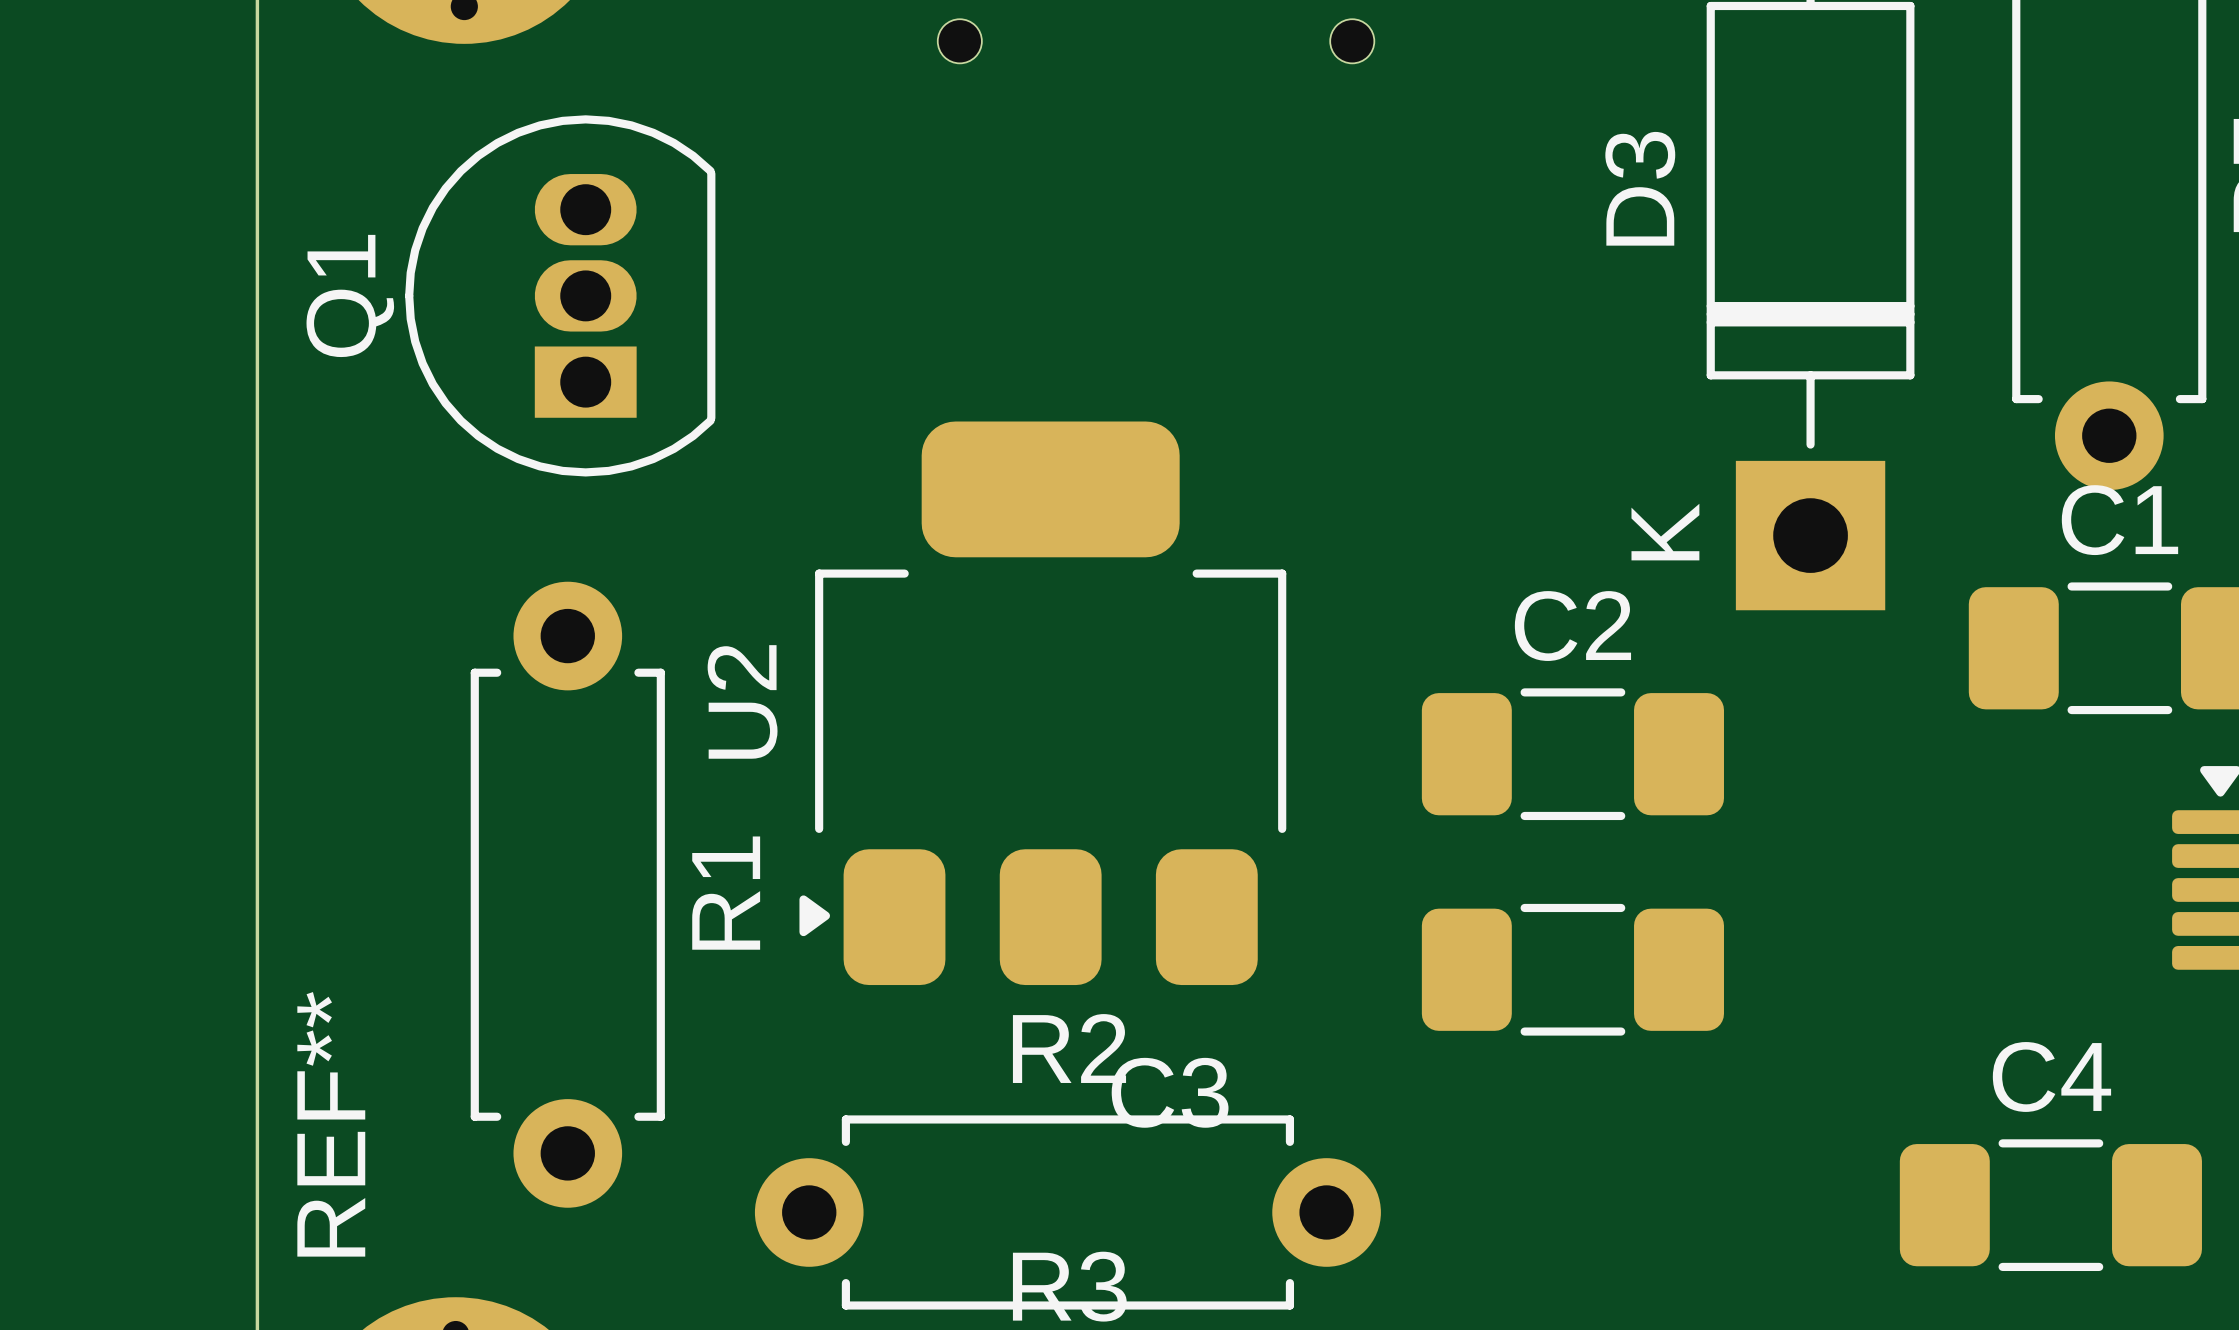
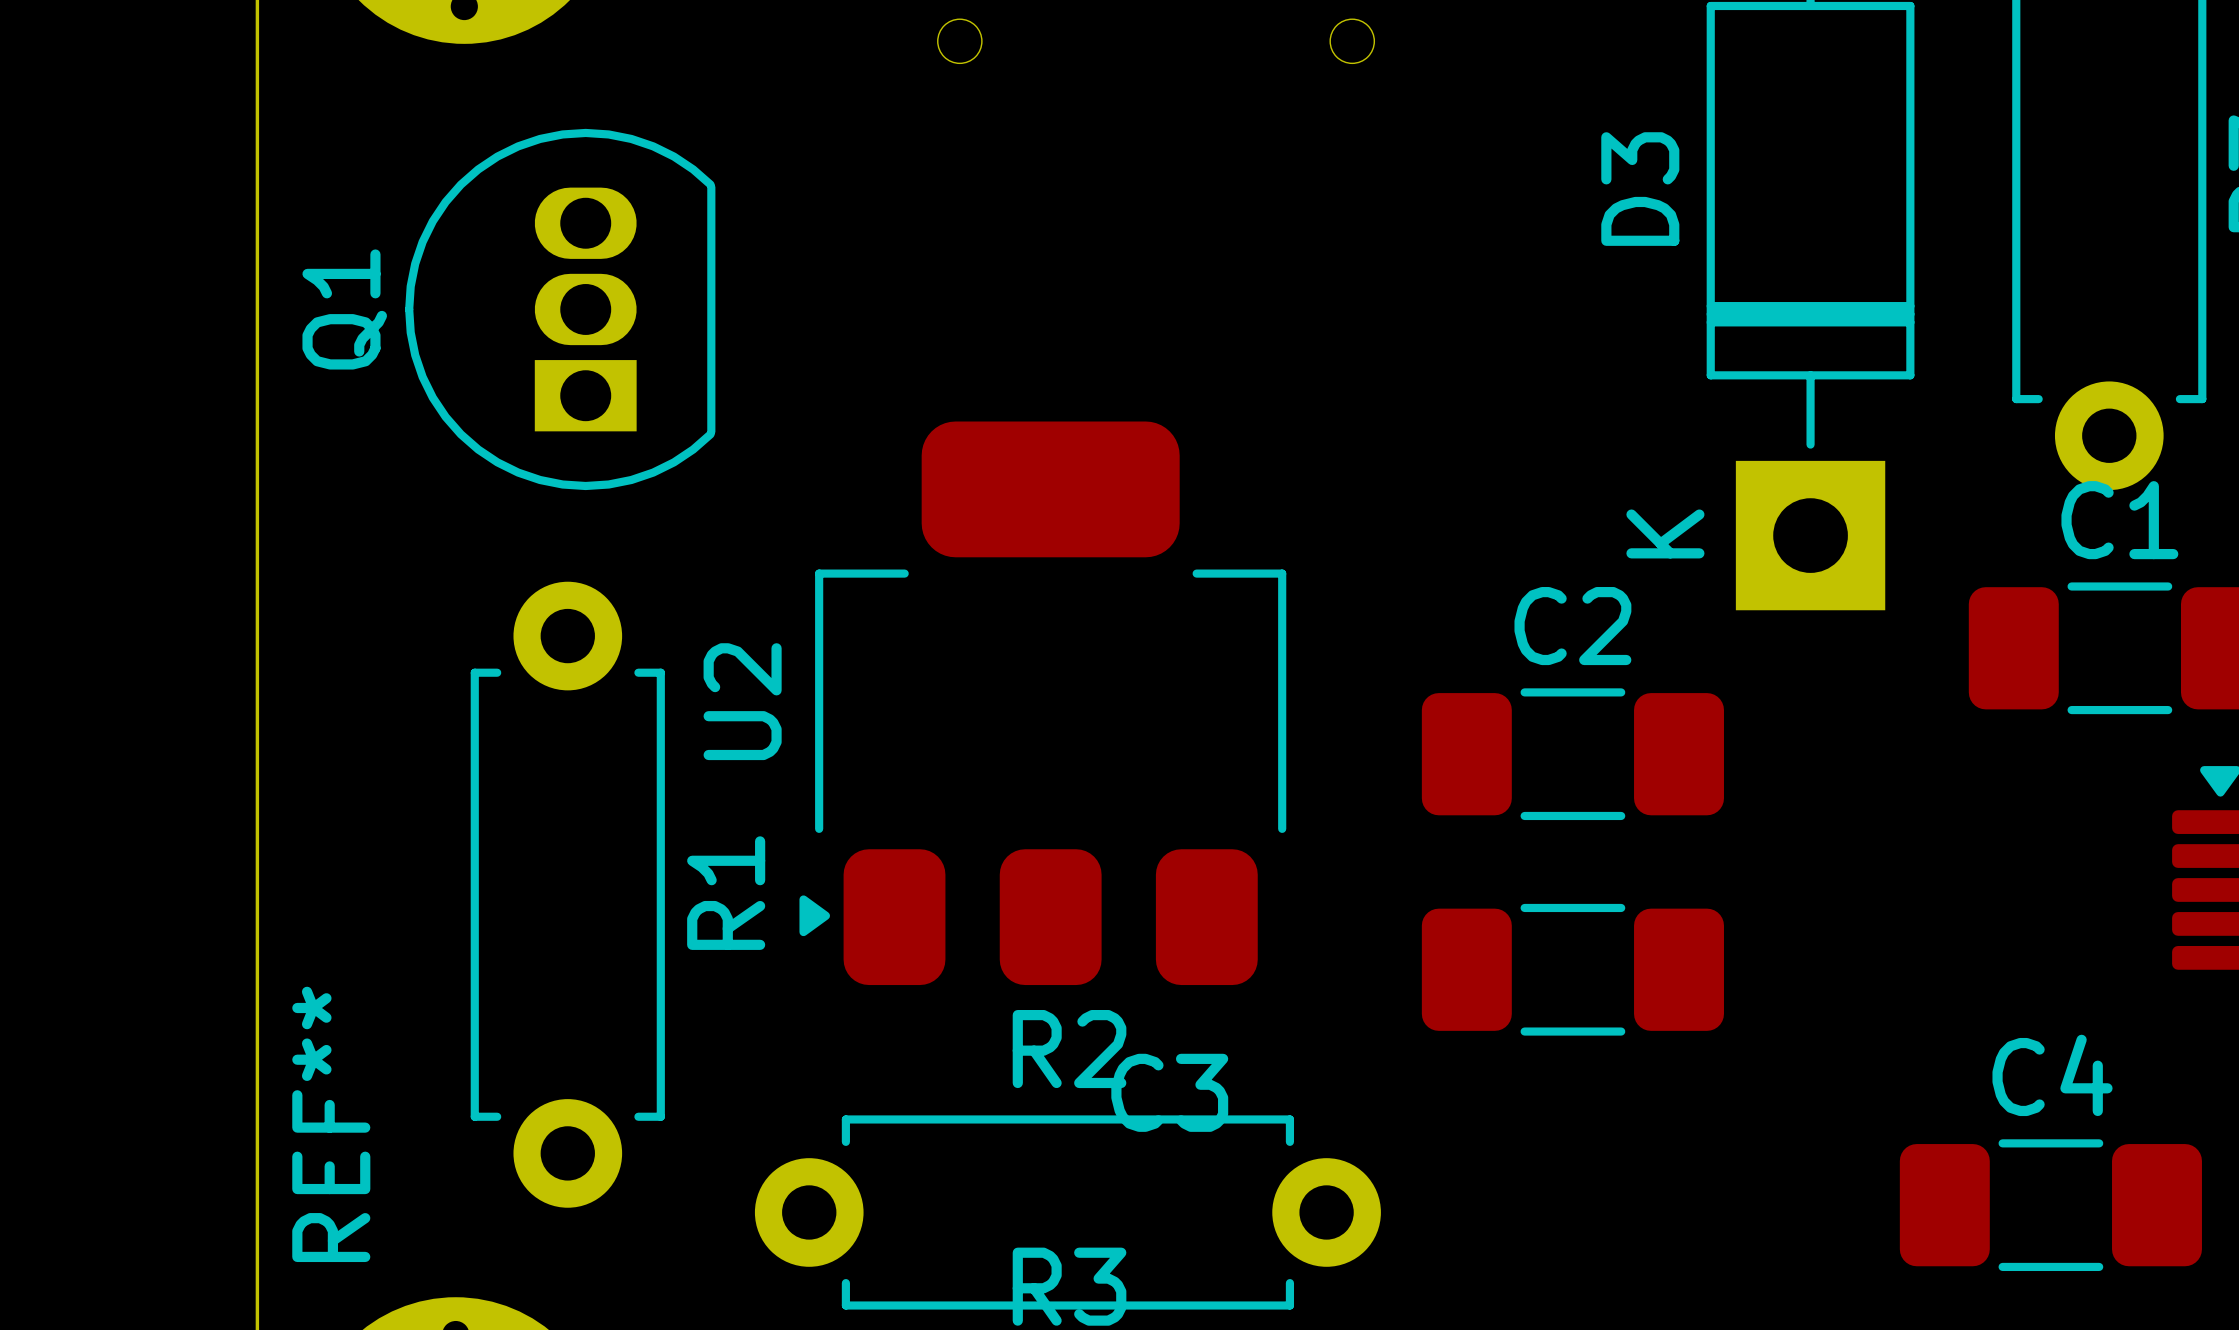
Q1 position: (560, 295) -> (560, 309)

